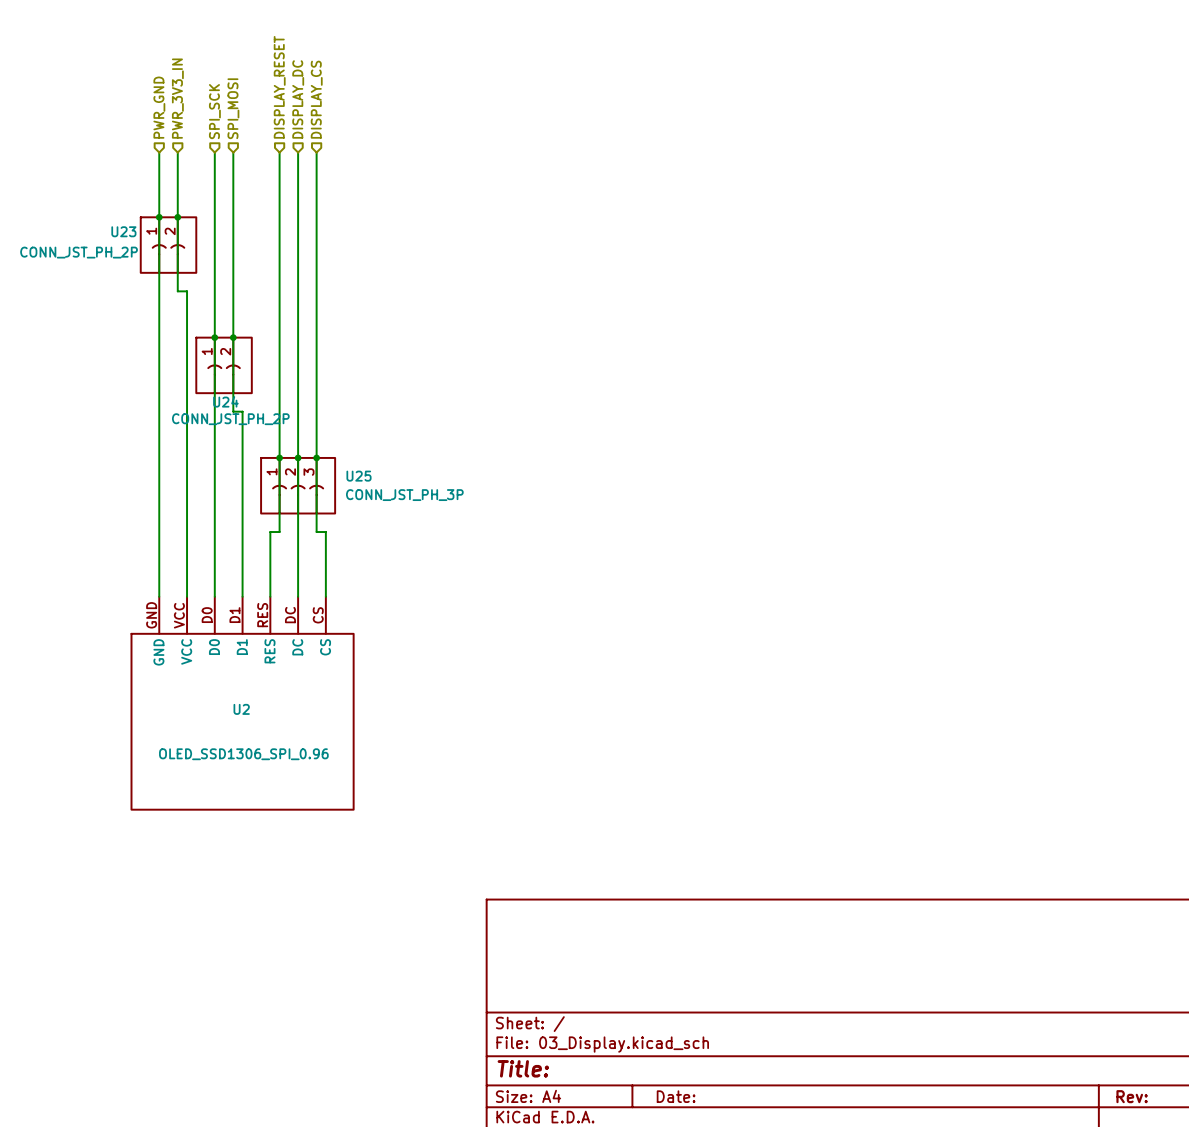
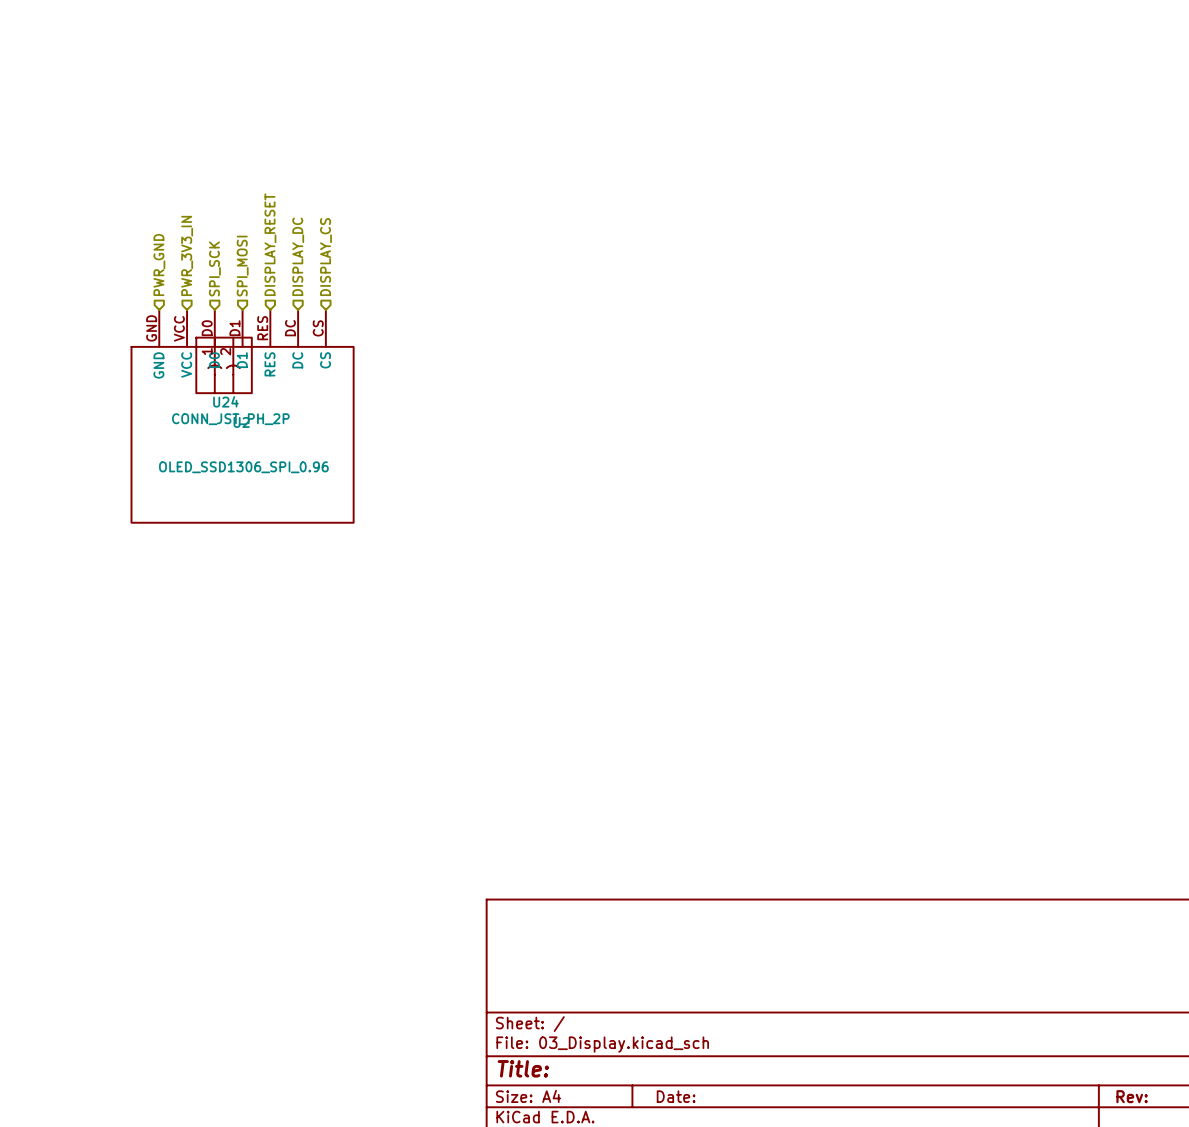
hierarchical label position: DISPLAY_RESET (279, 87) -> DISPLAY_RESET (270, 244)
hierarchical label position: PWR_3V3_IN (177, 98) -> PWR_3V3_IN (187, 255)
hierarchical label position: DISPLAY_DC (298, 99) -> DISPLAY_DC (298, 256)
hierarchical label position: DISPLAY_CS (316, 99) -> DISPLAY_CS (325, 257)
hierarchical label position: PWR_GND (159, 107) -> PWR_GND (159, 264)
hierarchical label position: SPI_MOSI (233, 108) -> SPI_MOSI (242, 266)
hierarchical label position: SPI_SCK (214, 111) -> SPI_SCK (214, 268)
wire: (159, 152) (159, 596) -> none
wire: (177, 152) (177, 291) (187, 291) (187, 596) -> none
wire: (214, 152) (214, 596) -> none
wire: (233, 152) (233, 411) (242, 411) (242, 596) -> none
wire: (279, 152) (279, 532) (270, 532) (270, 596) -> none
wire: (298, 152) (298, 596) -> none
wire: (316, 152) (316, 532) (325, 532) (325, 596) -> none
junction: (159, 217) -> none
junction: (177, 217) -> none
U23: CONN_JST_PH_2P (168, 245) -> none
junction: (214, 337) -> none
junction: (233, 337) -> none
junction: (279, 457) -> none
junction: (298, 457) -> none
junction: (316, 457) -> none
U25: CONN_JST_PH_3P (298, 485) -> none
U2 position: (242, 703) -> (242, 416)

